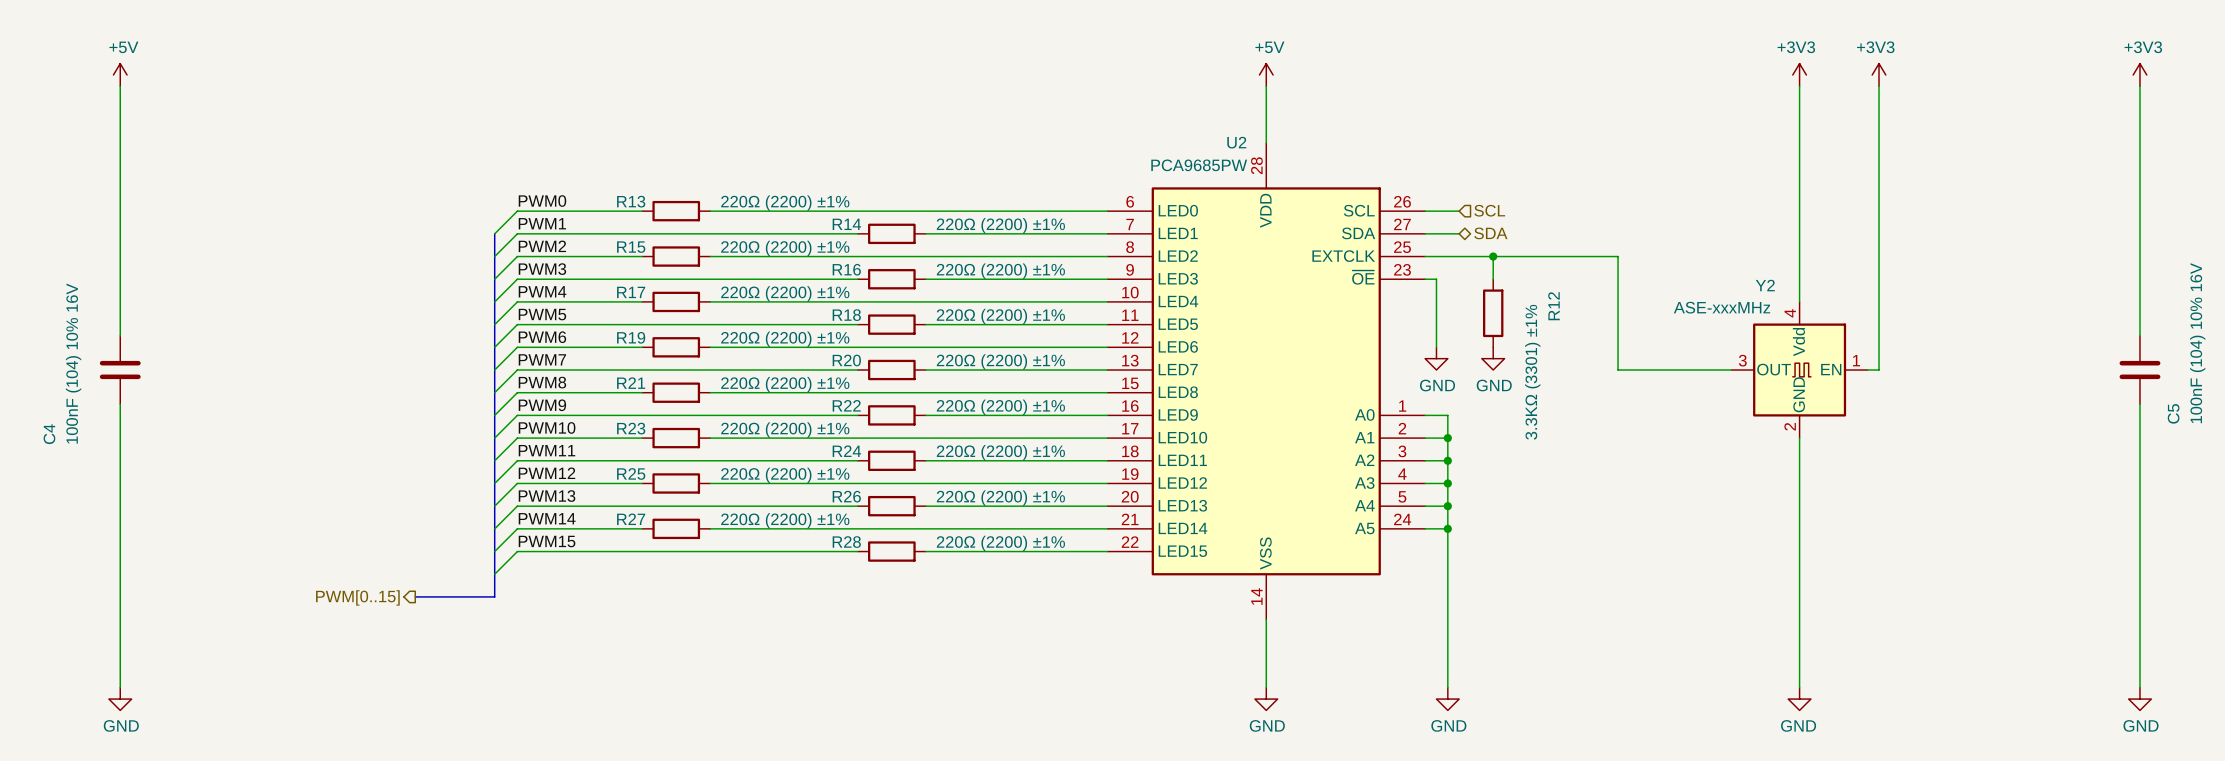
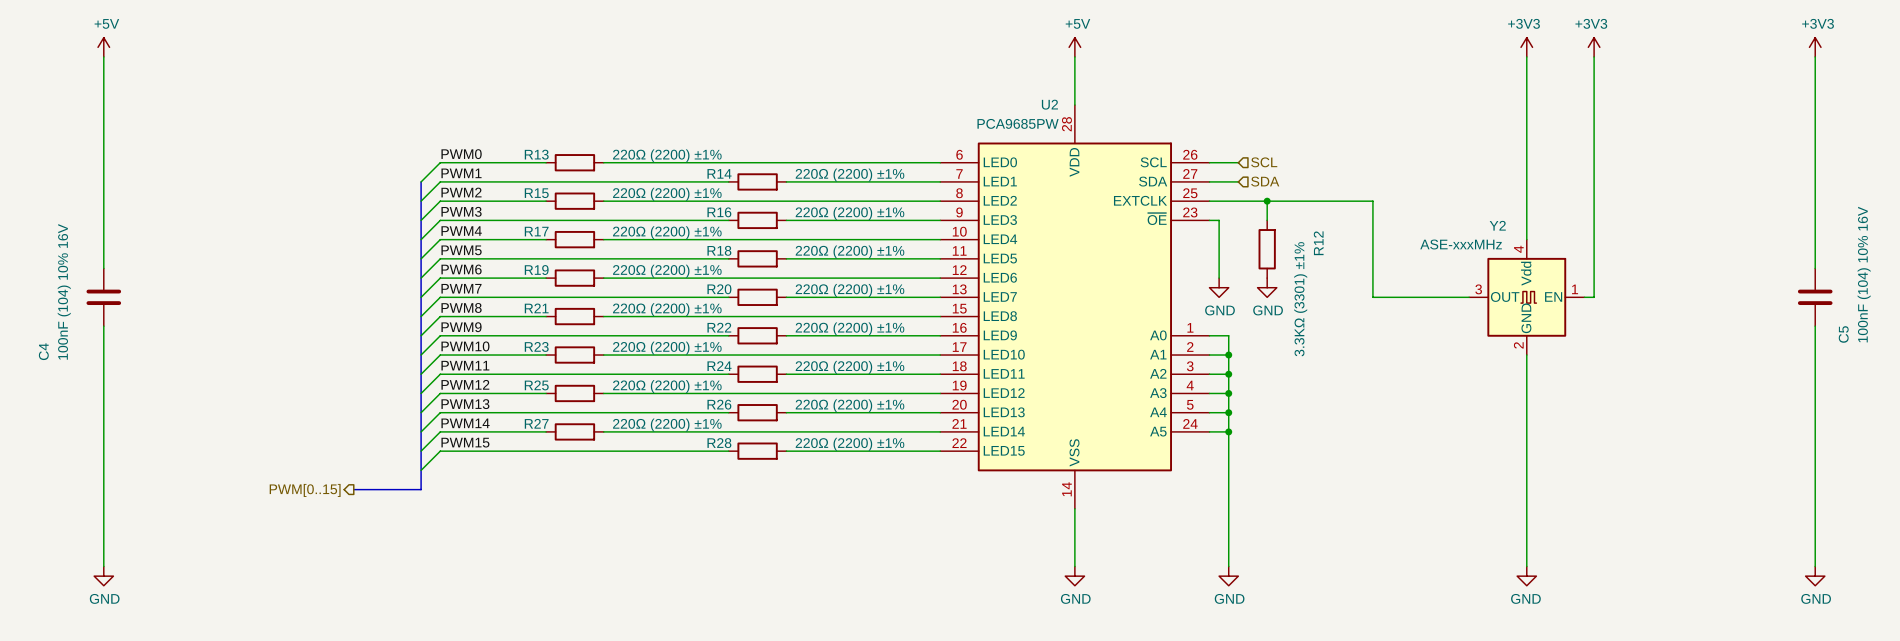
hierarchical label shape: bidirectional (1490, 233) -> input (1265, 181)

